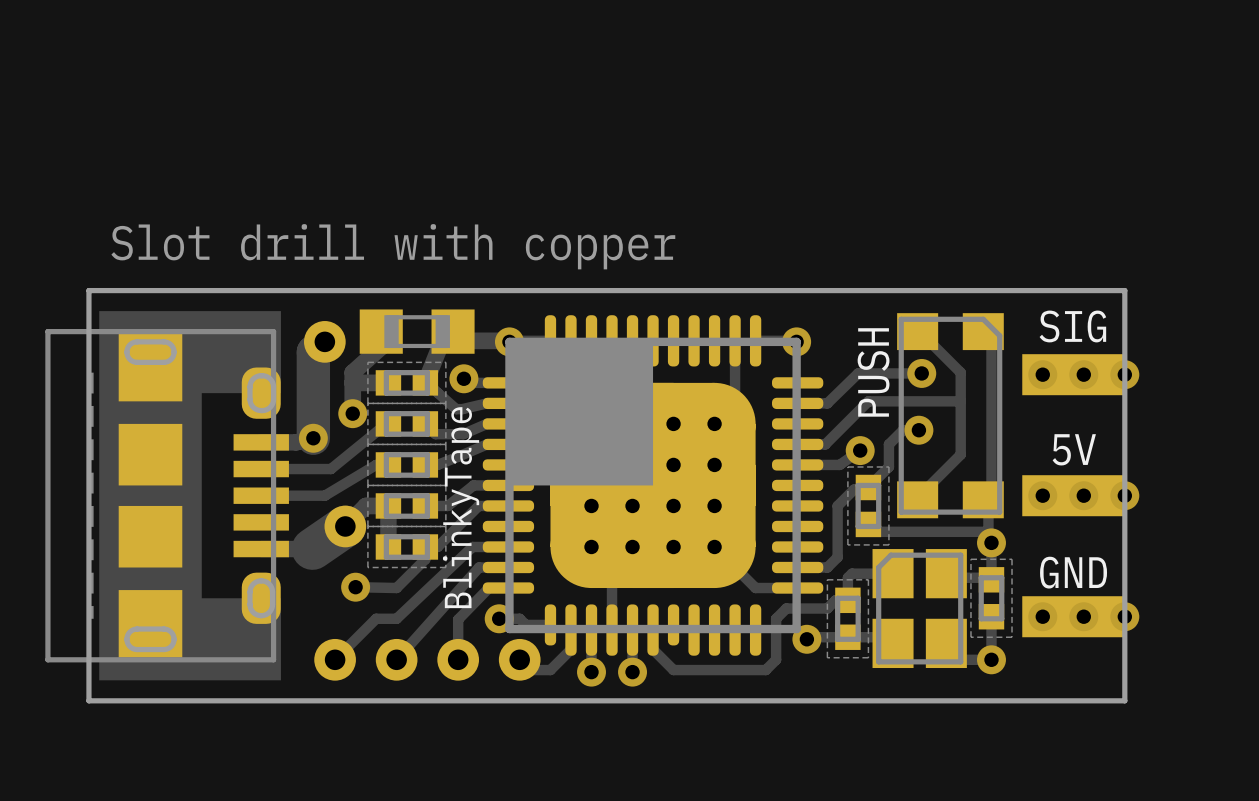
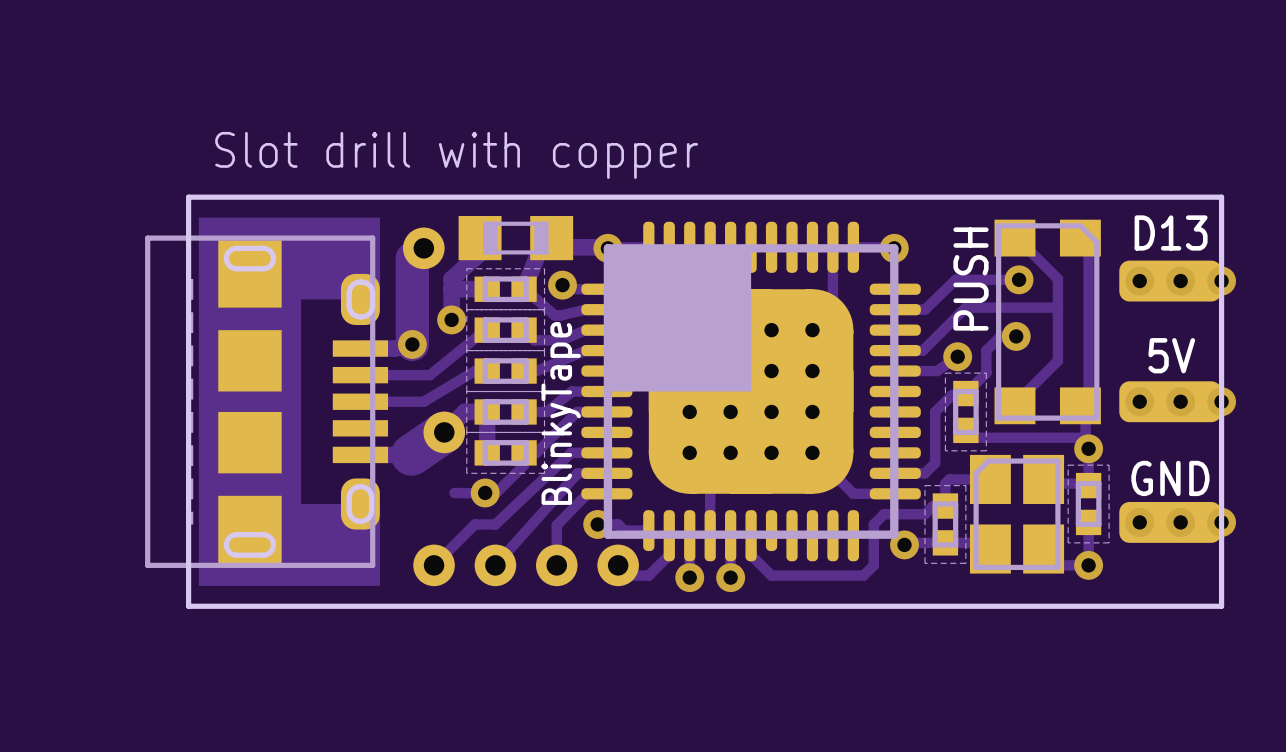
text: SIG (1072, 326) -> D13 (1171, 232)
part footprint: [1022, 354, 1125, 638] -> [1119, 260, 1222, 543]
via position: (355, 587) -> (485, 492)

